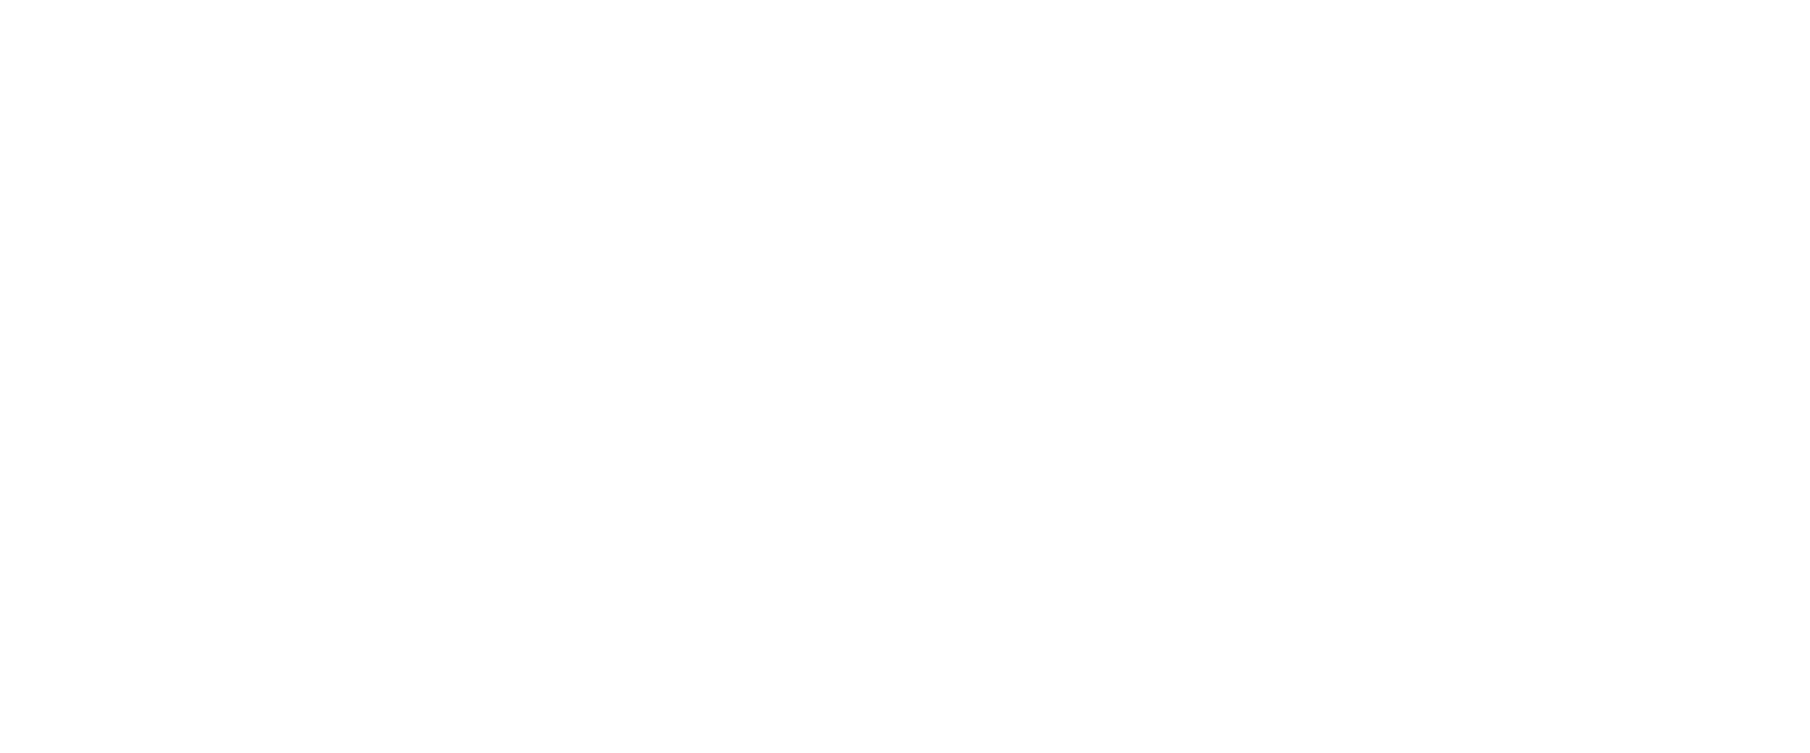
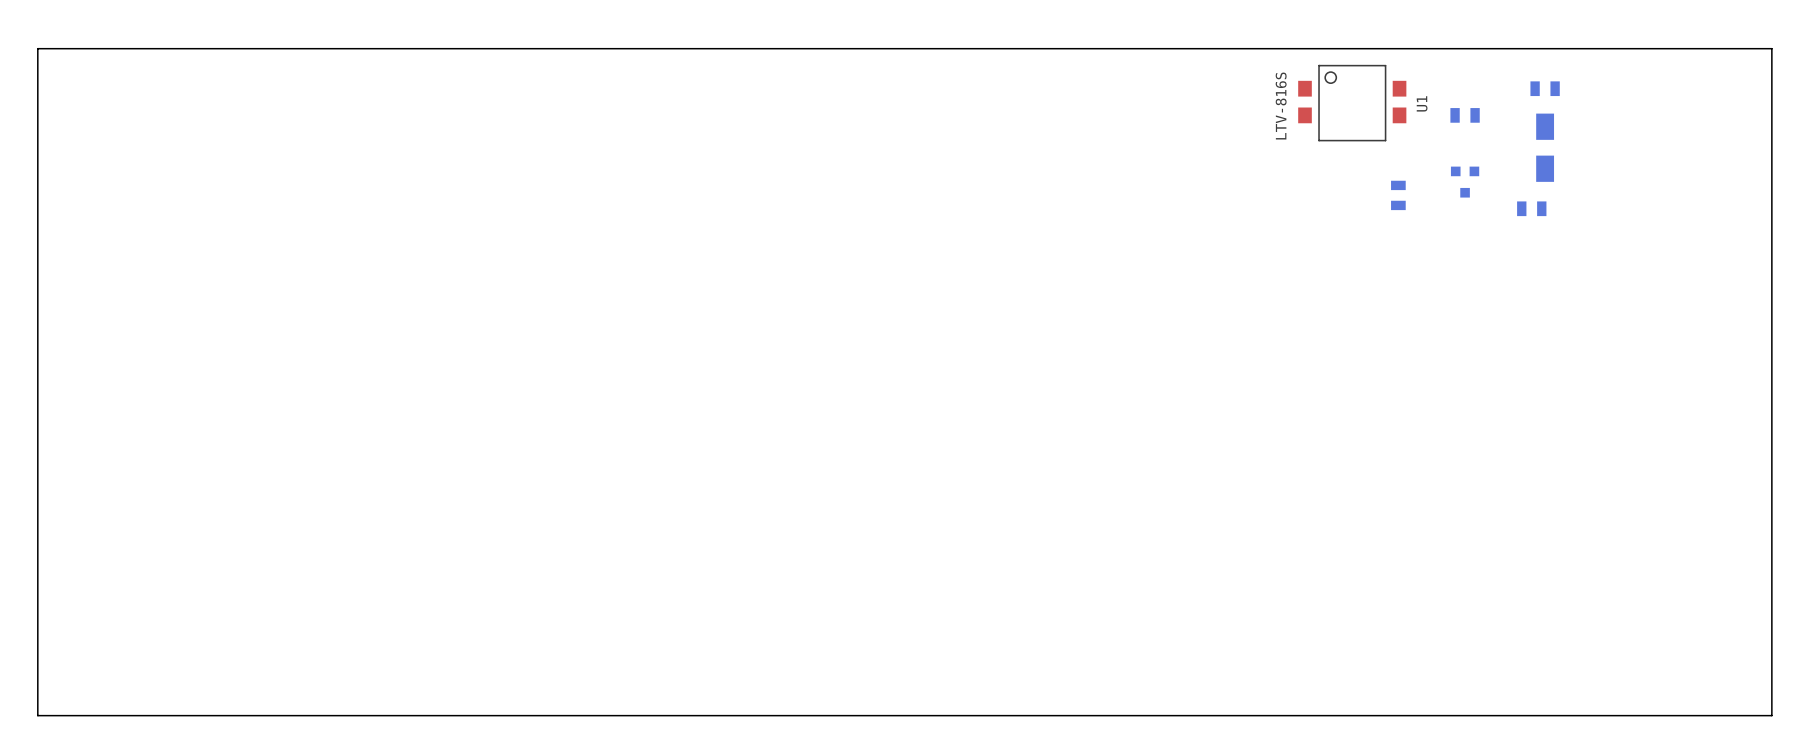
board edge: none -> (37, 48) (37, 715) (1771, 715) (1771, 48) (37, 48)
part: none -> (1545, 88)
U1: none -> LTV-816S (1352, 103)
part: none -> (1465, 115)
part: none -> (1545, 147)
part: none -> (1465, 182)
part: none -> (1398, 195)
part: none -> (1531, 208)

